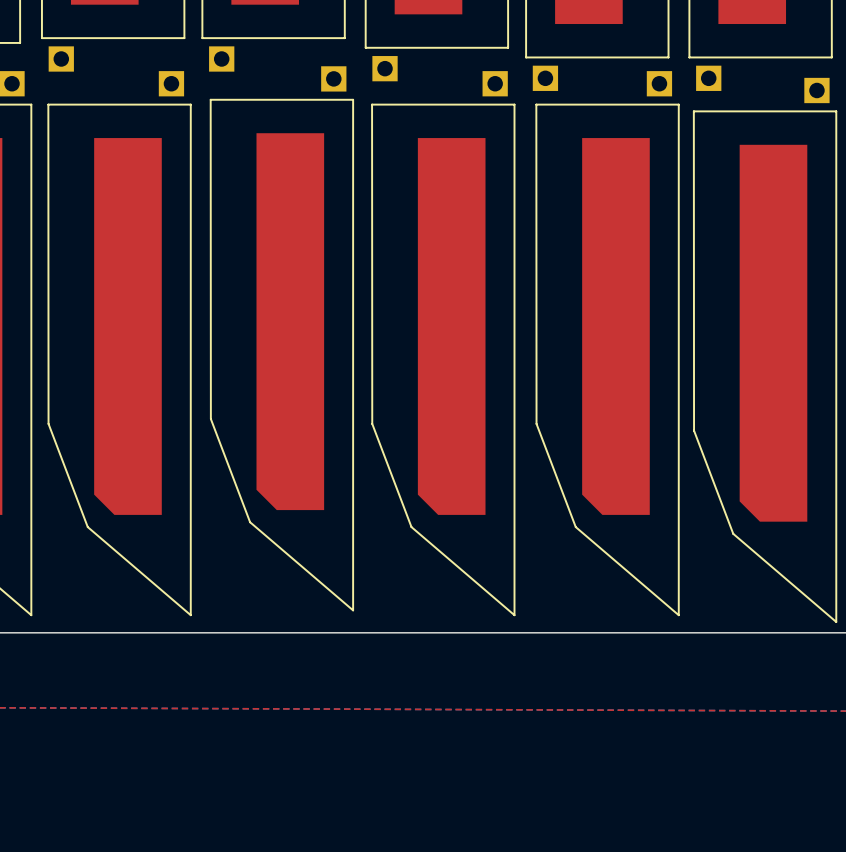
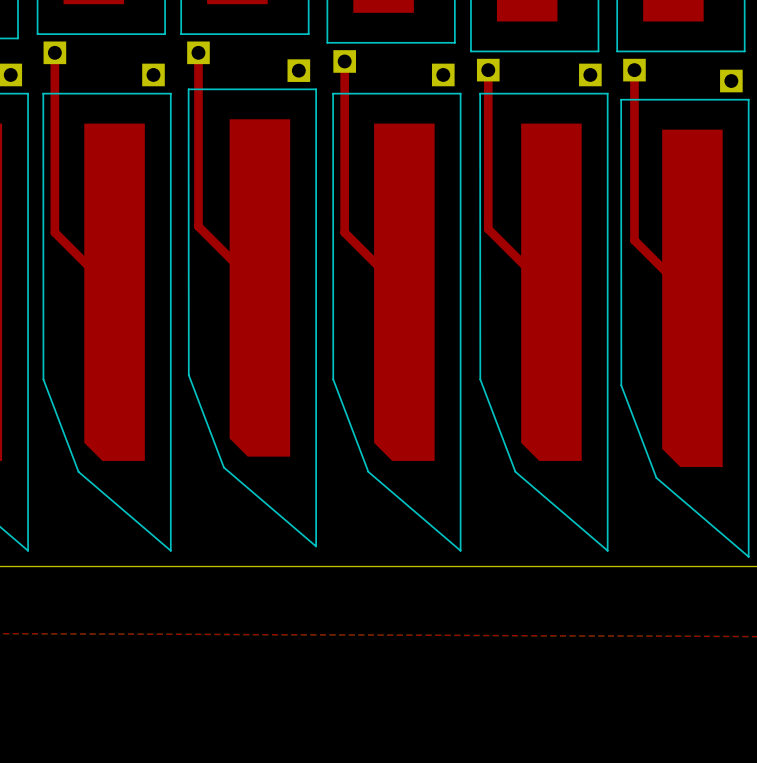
top track: none -> (54, 52) (54, 232) (114, 292)
top track: none -> (198, 52) (198, 226) (259, 287)
top track: none -> (344, 61) (344, 232) (404, 292)
top track: none -> (488, 70) (488, 229) (551, 292)
top track: none -> (634, 70) (634, 240) (692, 298)

